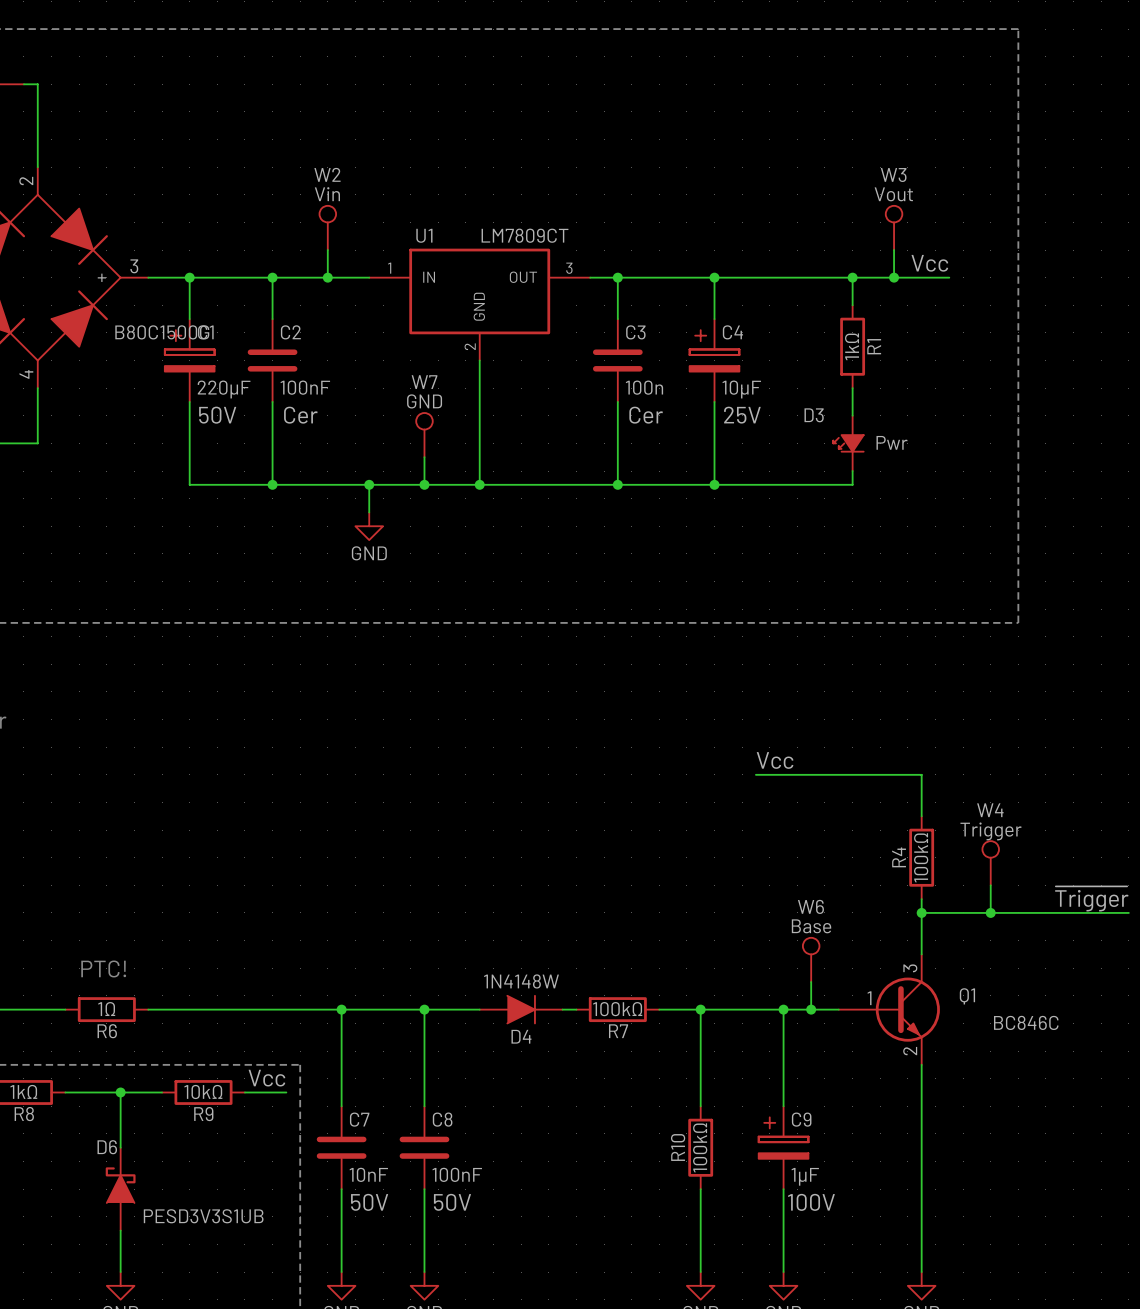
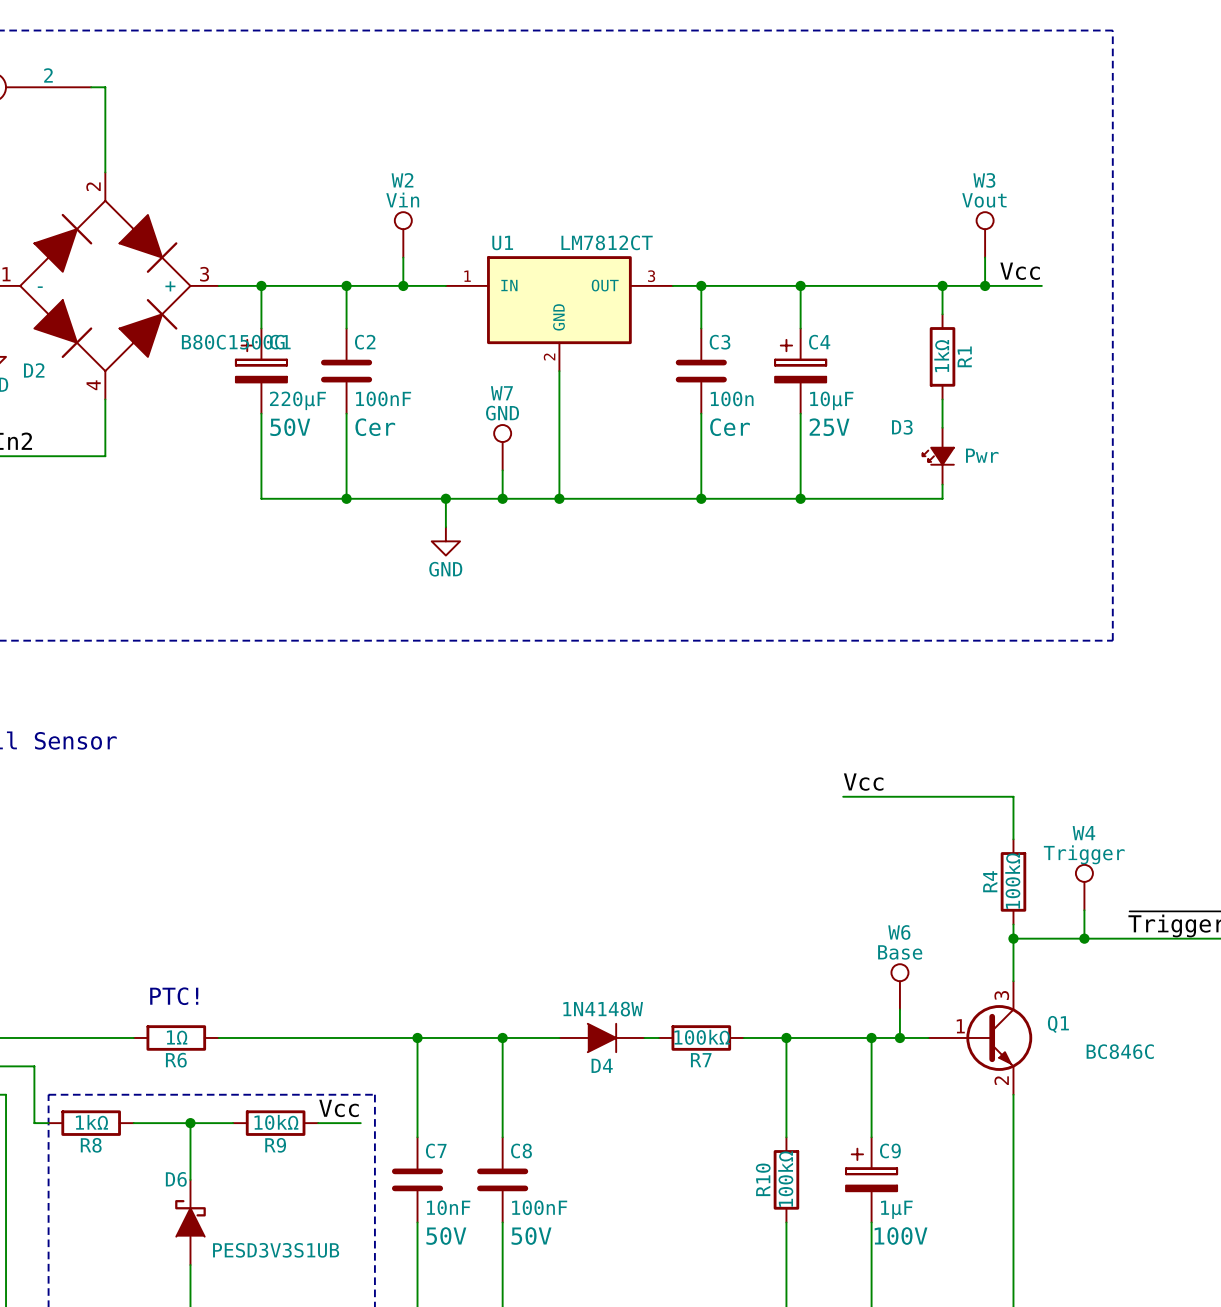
U1 value: LM7809CT (525, 235) -> LM7812CT (607, 242)

